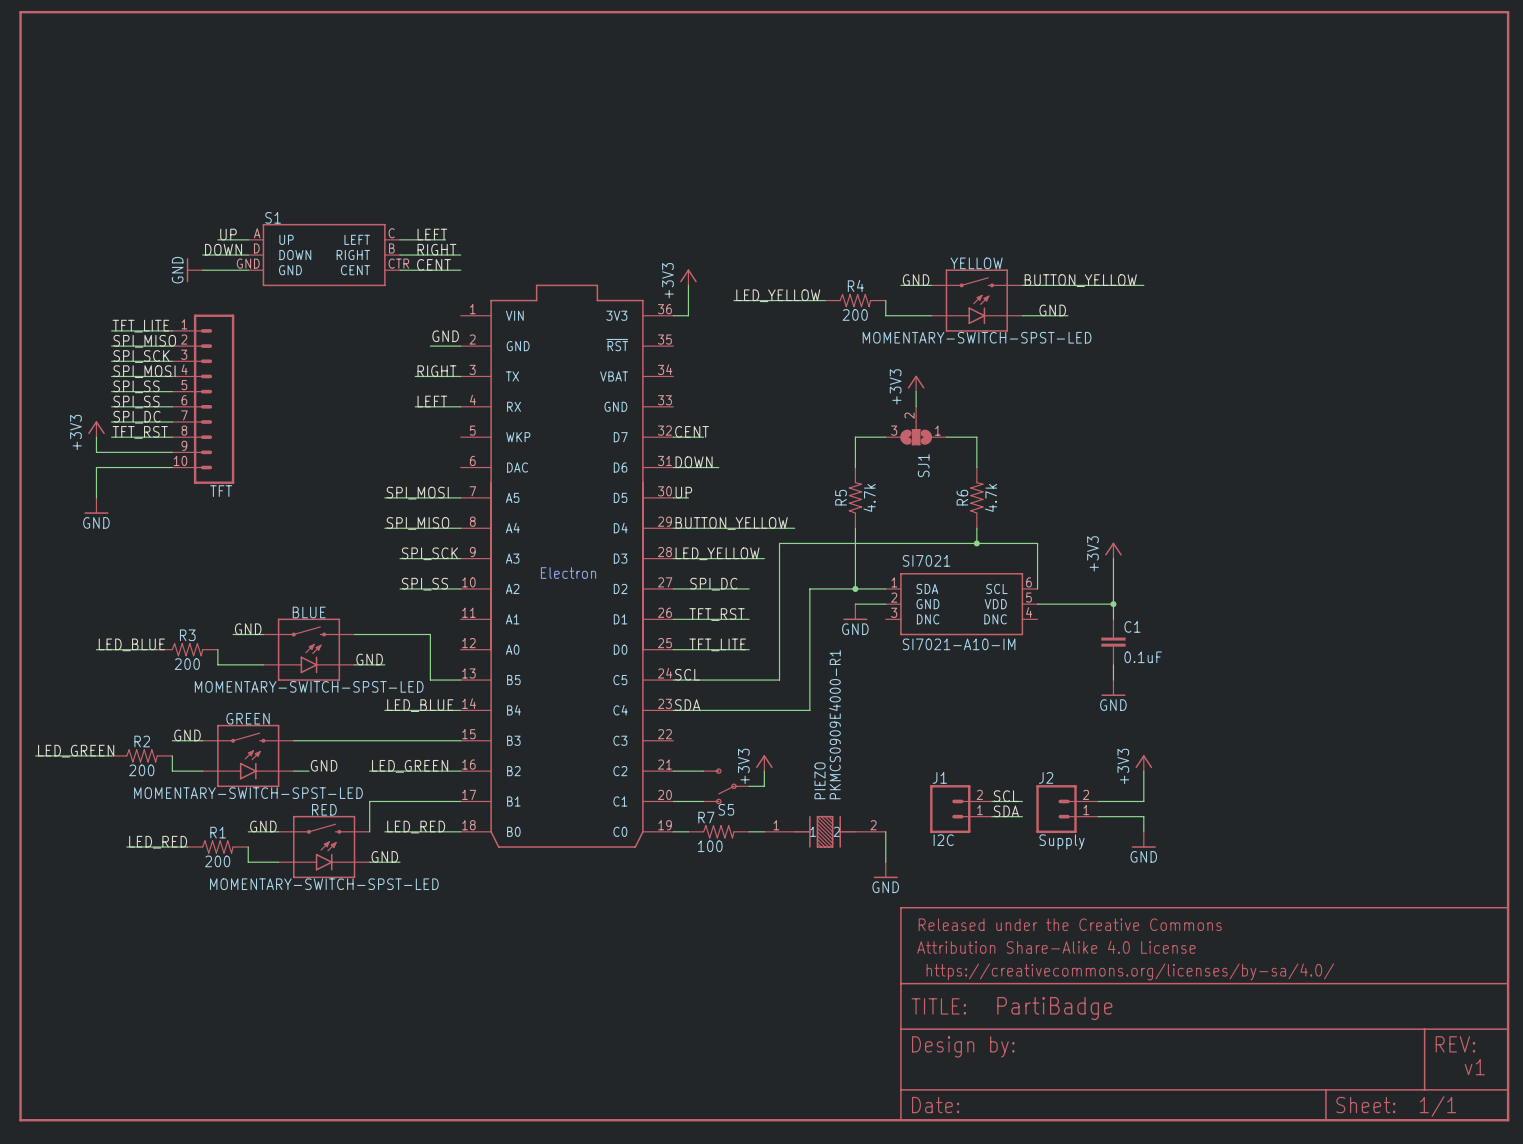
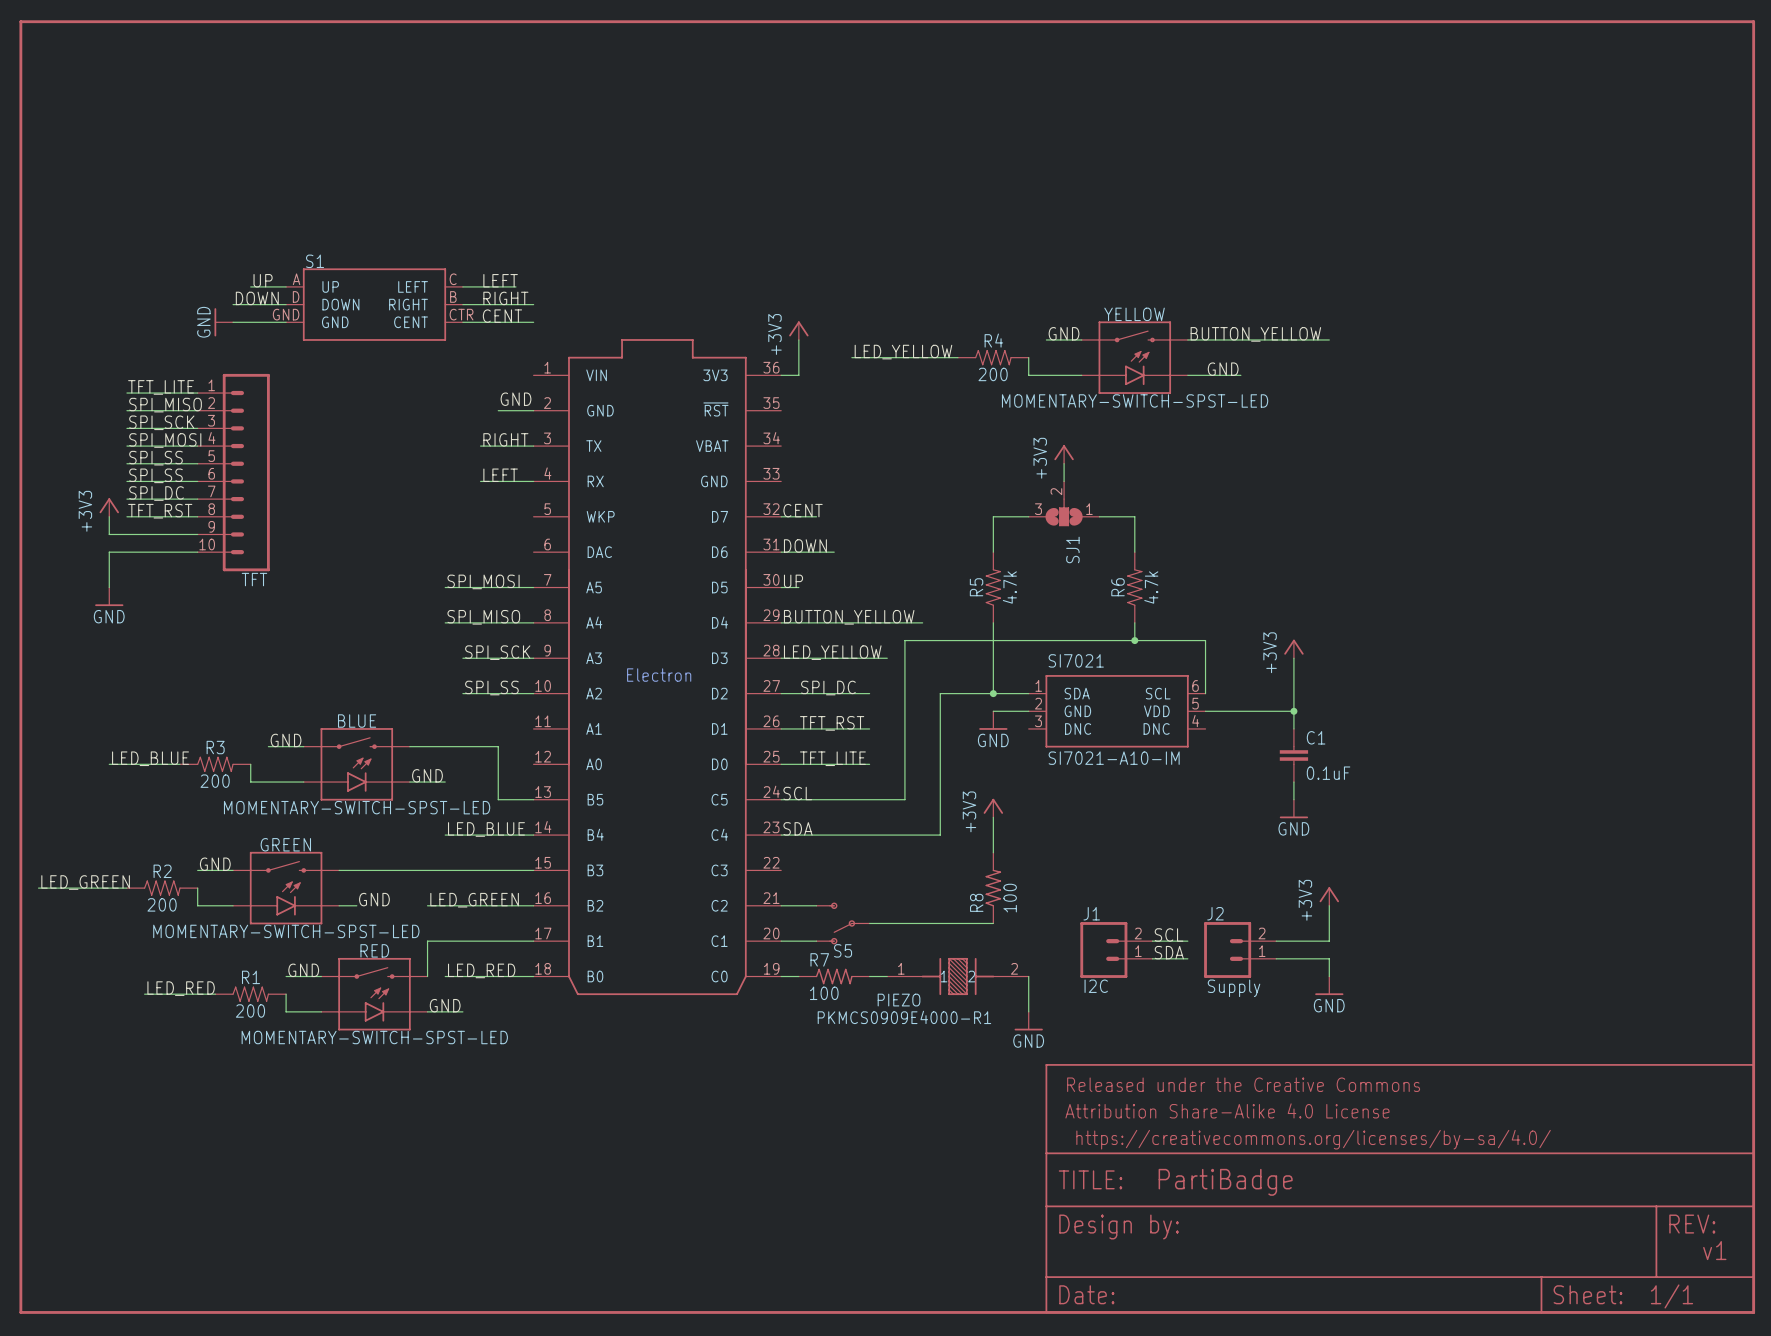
wire: none -> (993, 817) (993, 852)
PIEZO value rotation: 0° (835, 724) -> 90° clockwise (904, 1017)
R8: none -> 100 (993, 888)
power symbol position: +3V3 (764, 763) -> +3V3 (993, 808)
wire: (764, 771) (764, 786) -> (993, 923) (887, 923)
PIEZO name rotation: 0° (820, 780) -> 90° clockwise (899, 1000)
PIEZO name position: PIEZO (820, 780) -> PIEZO (899, 1000)

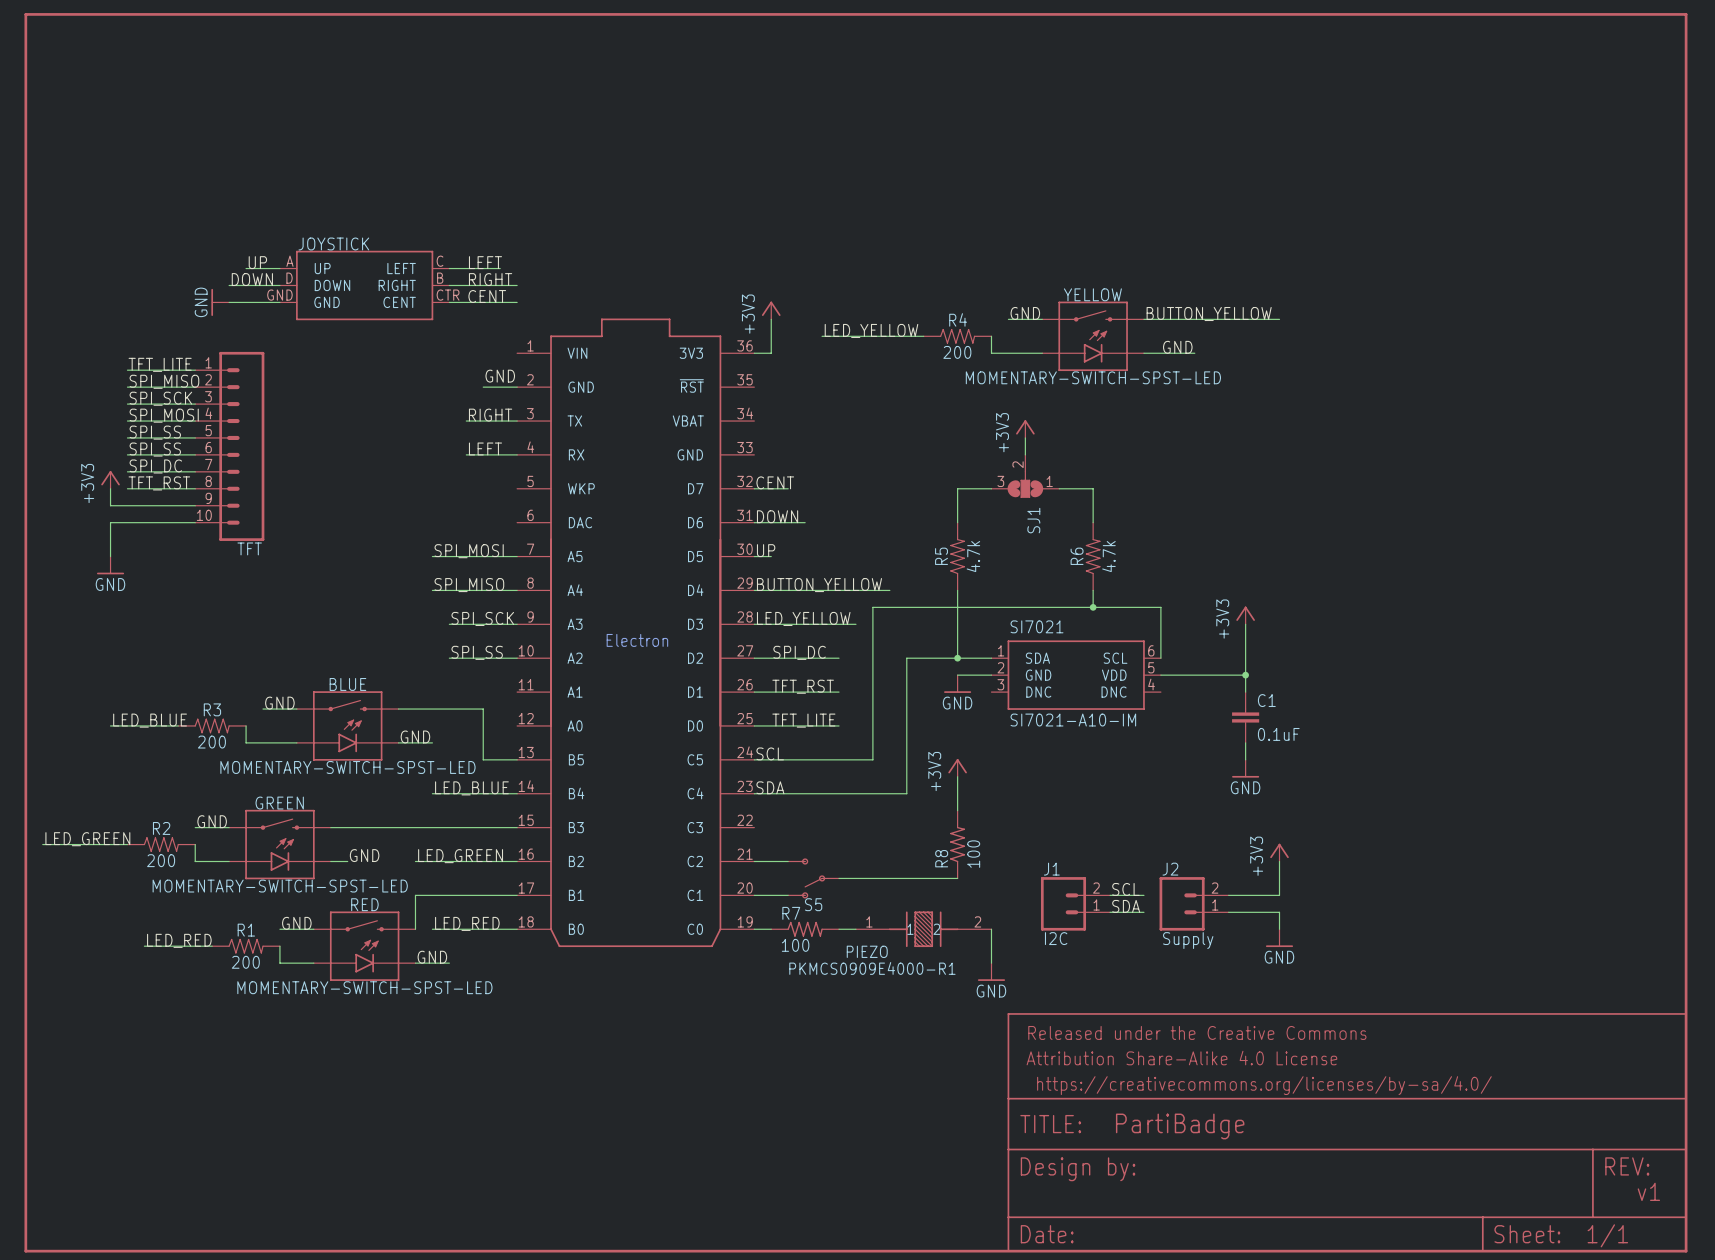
S1 name: S1 (315, 261) -> JOYSTICK (333, 243)

